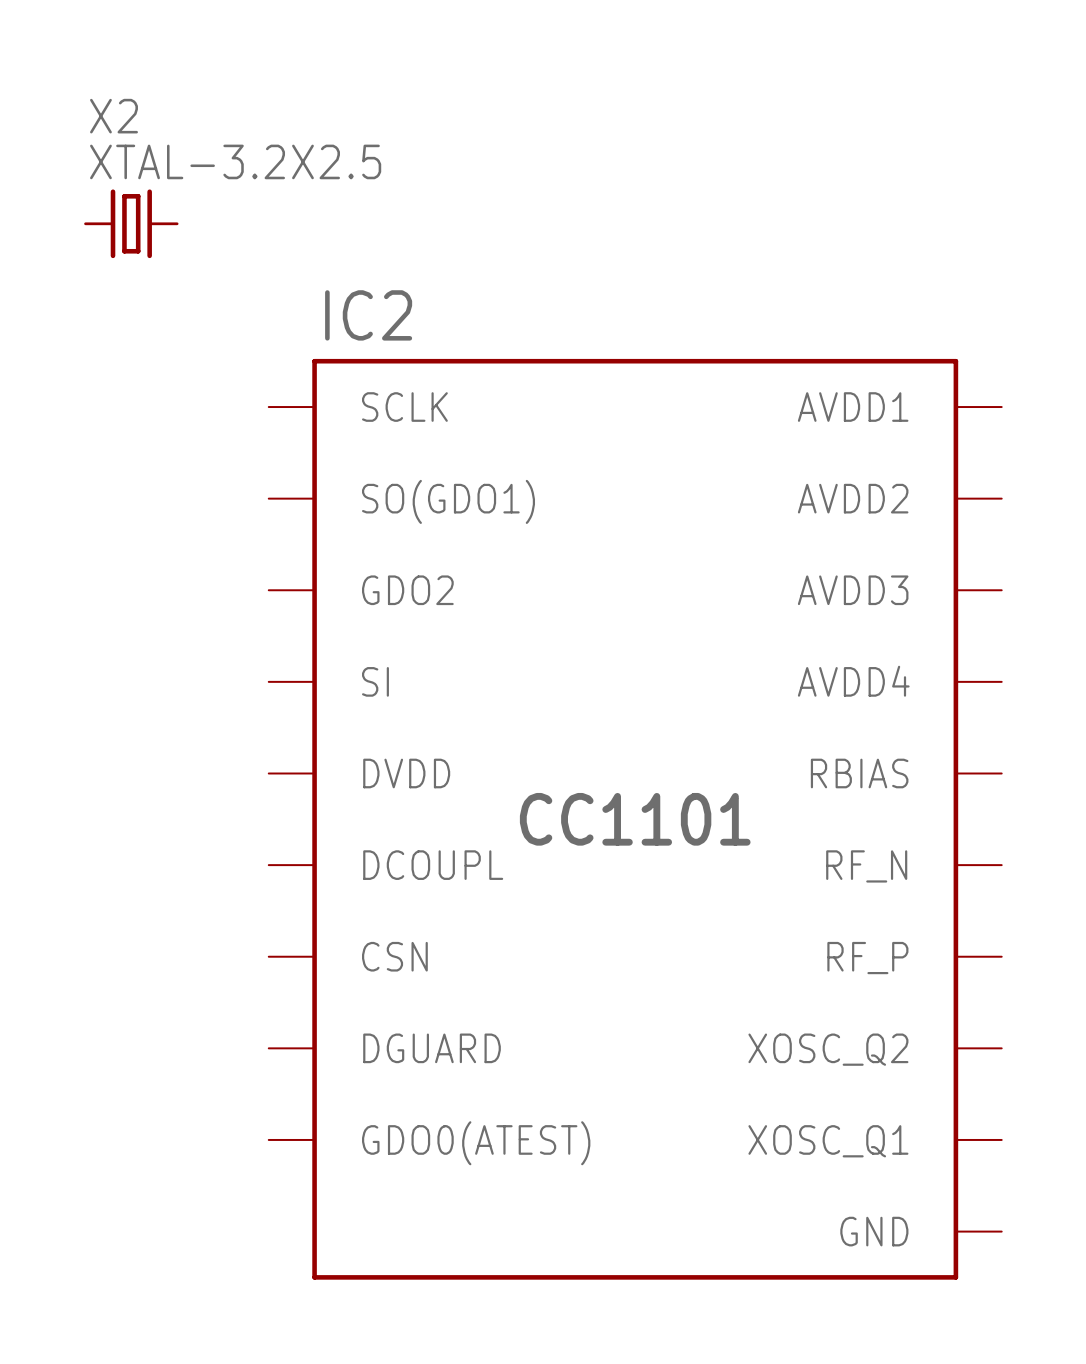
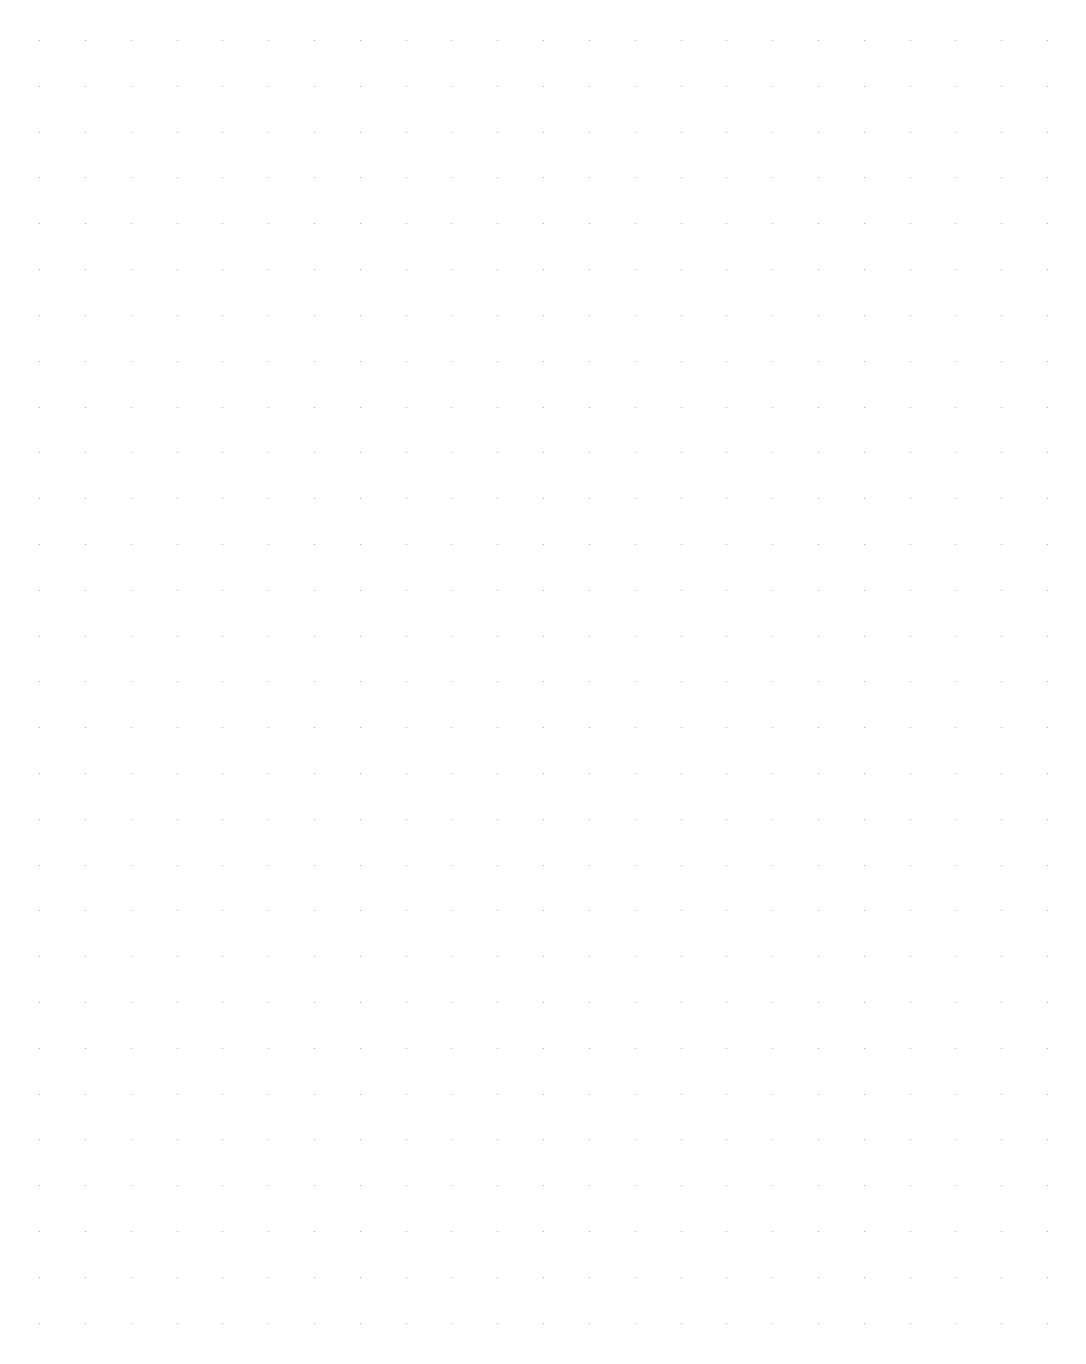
X2: XTAL-3.2X2.5 (131, 223) -> none
IC2: CC1101 (635, 819) -> none

